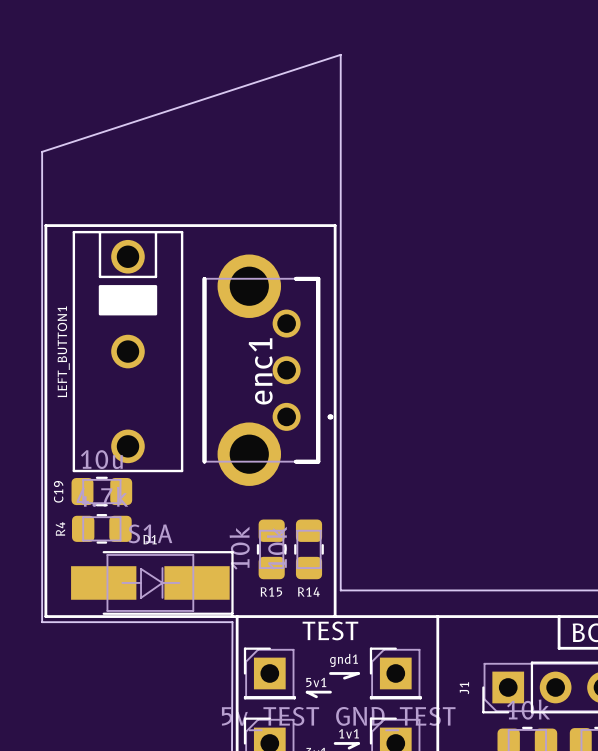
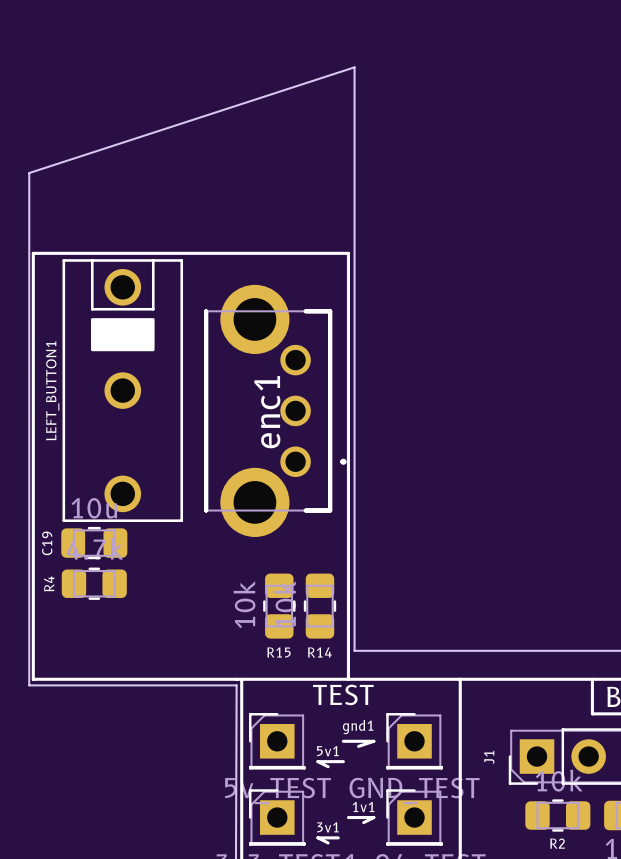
D1: S1A (152, 582) -> none

